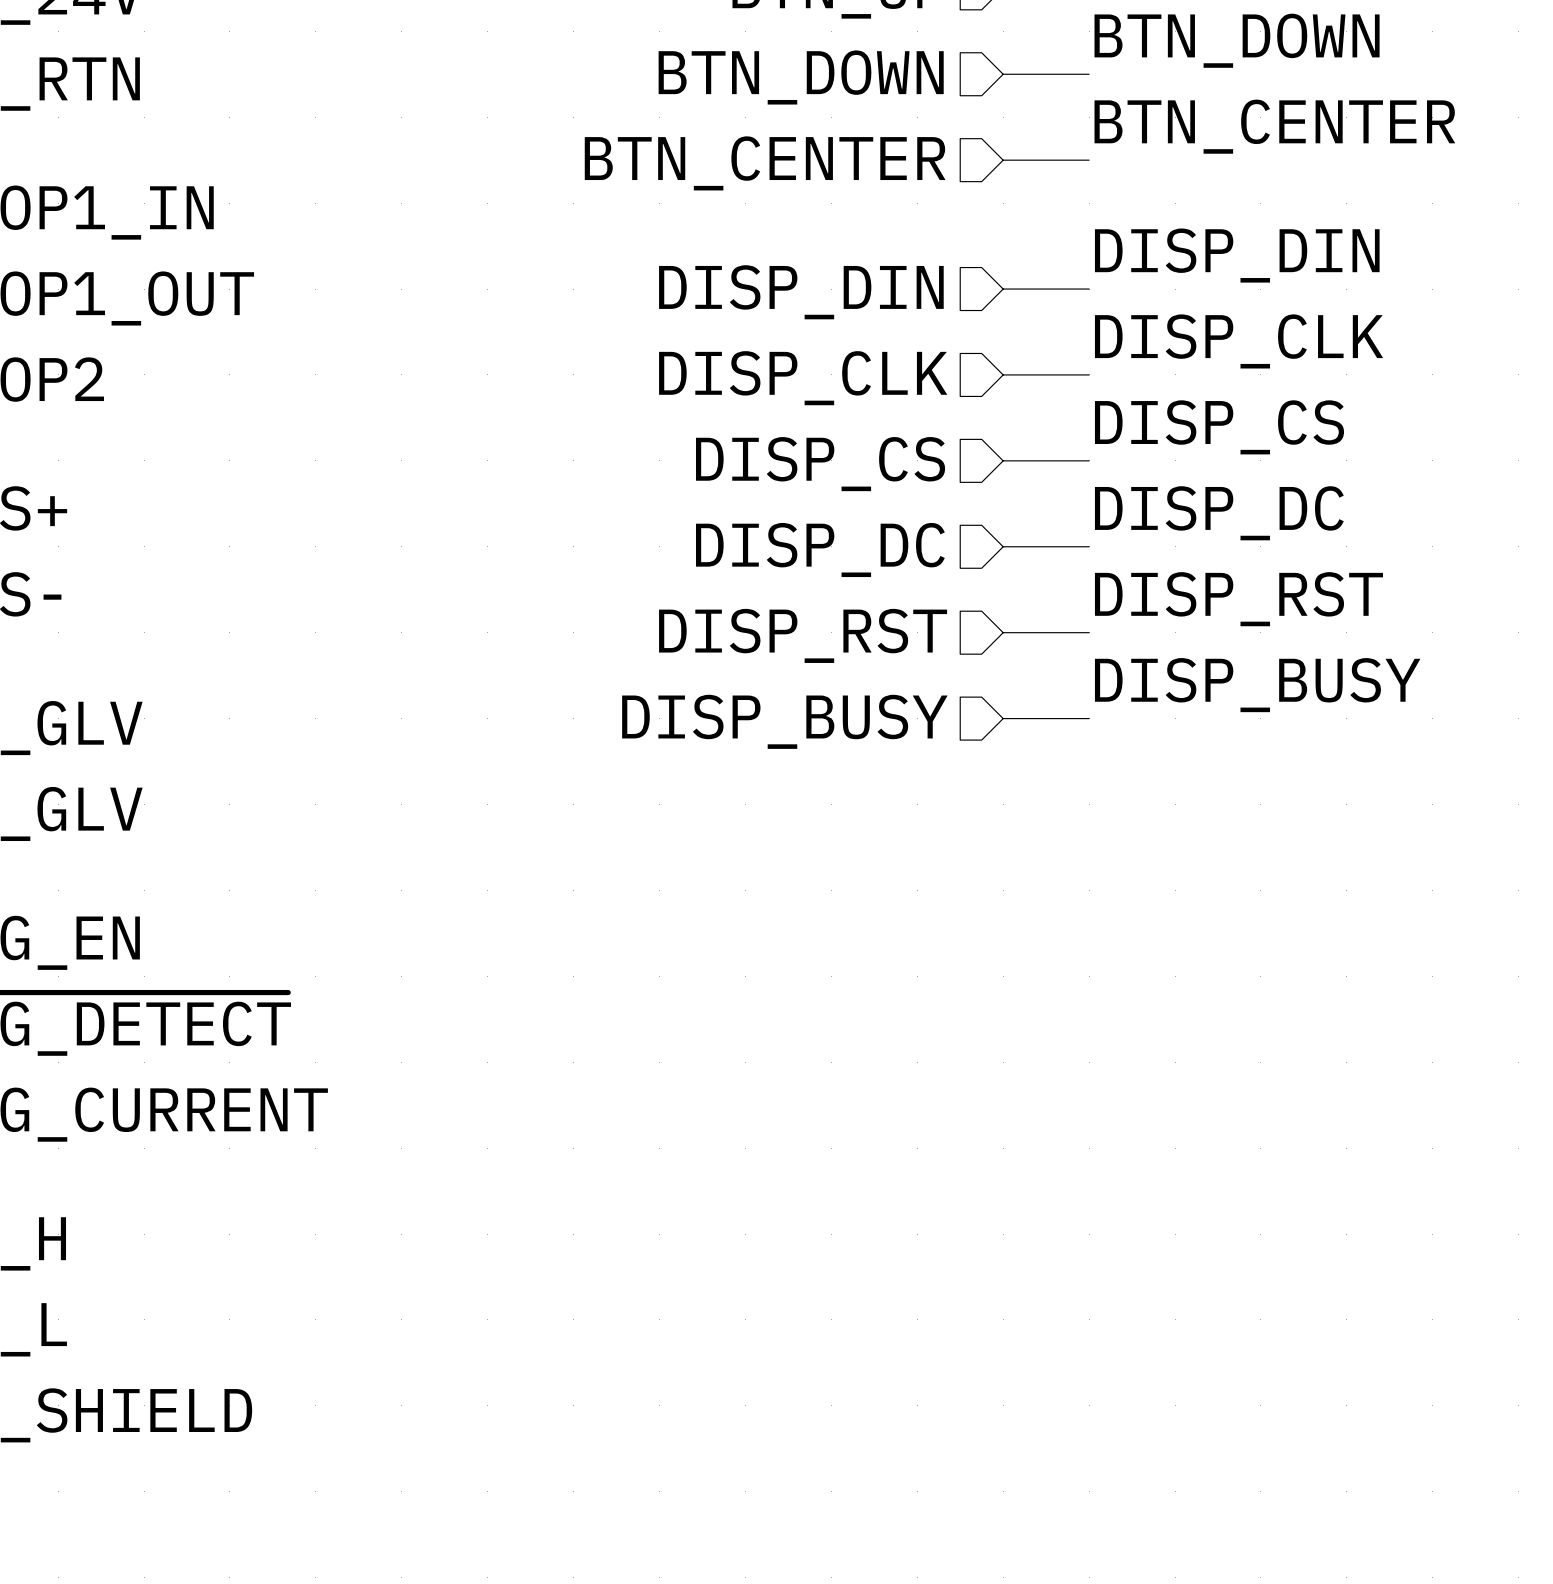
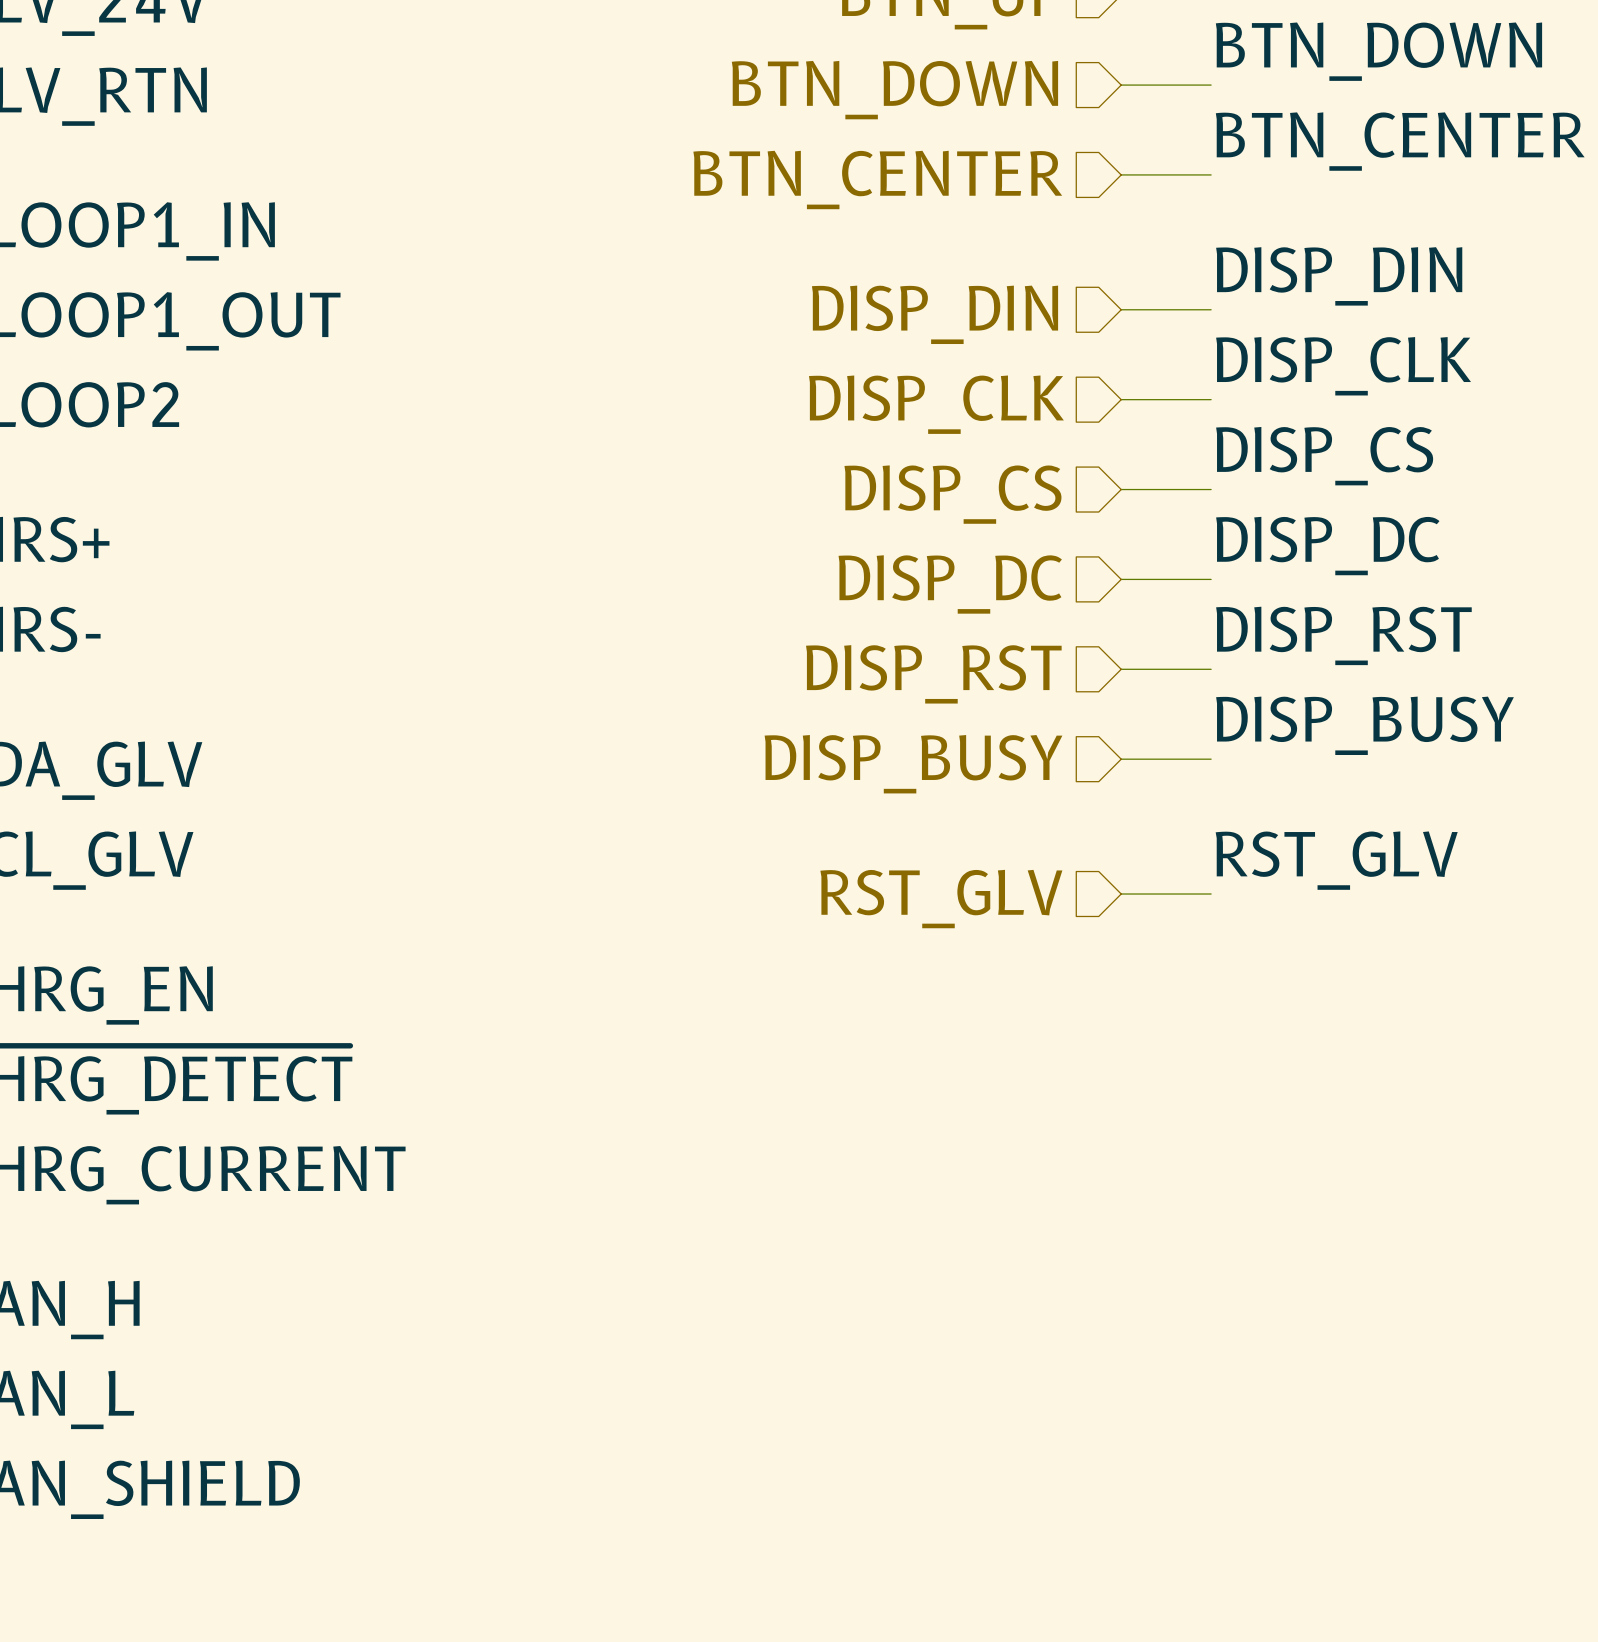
label: none -> RST_GLV (1336, 860)
wire: none -> (1121, 894) (1211, 894)
hierarchical label: none -> RST_GLV (941, 899)

